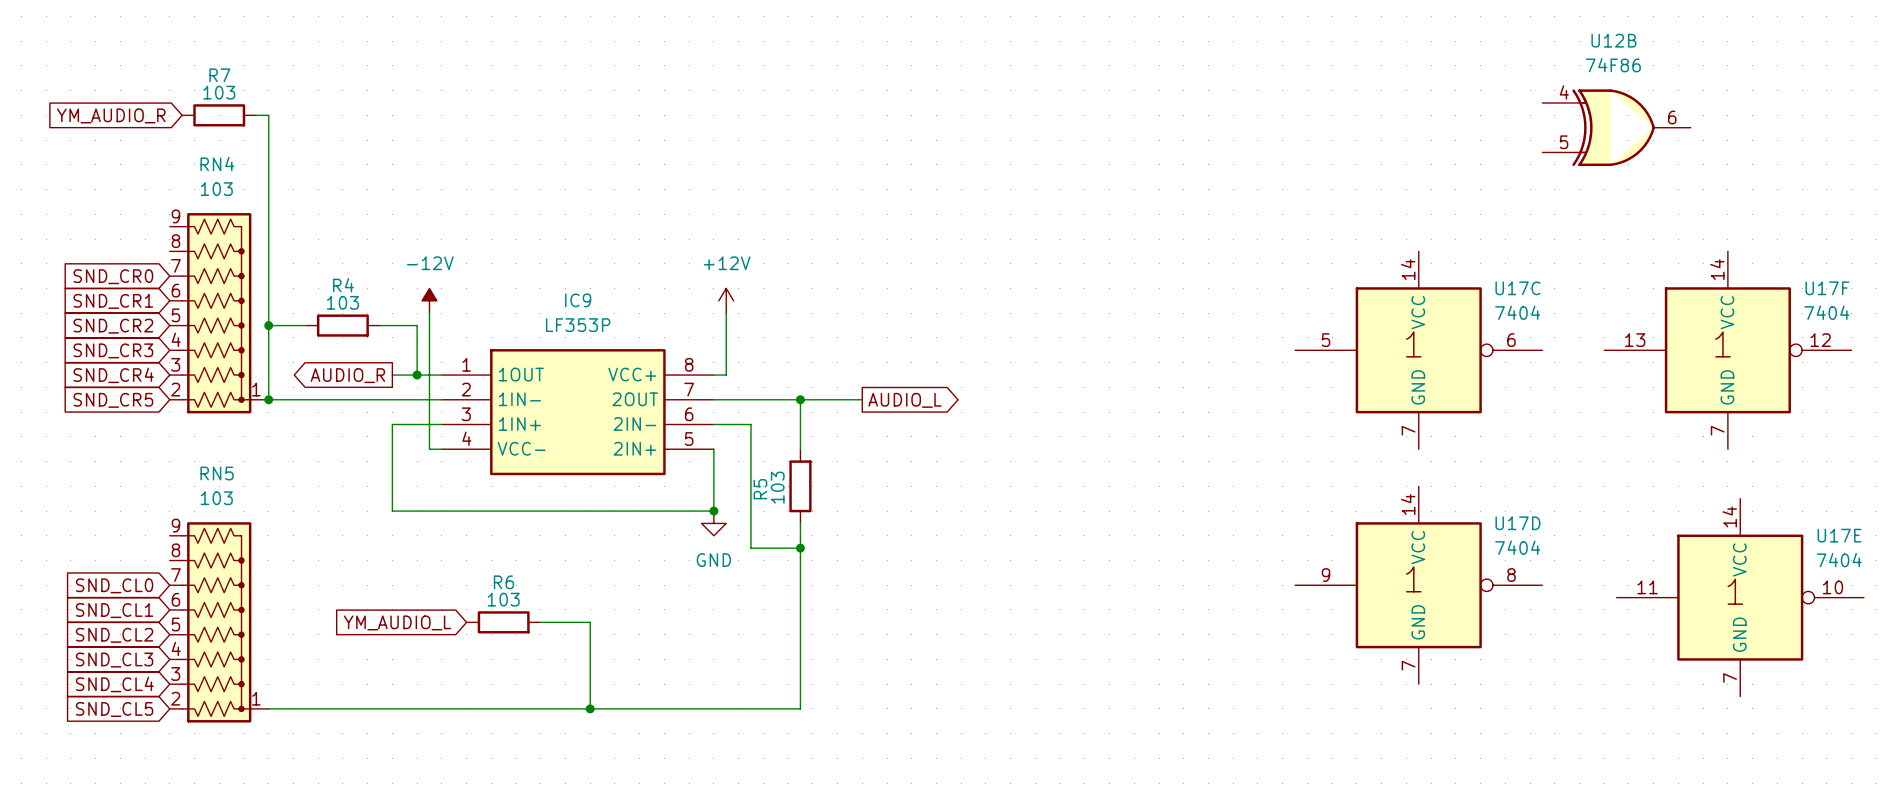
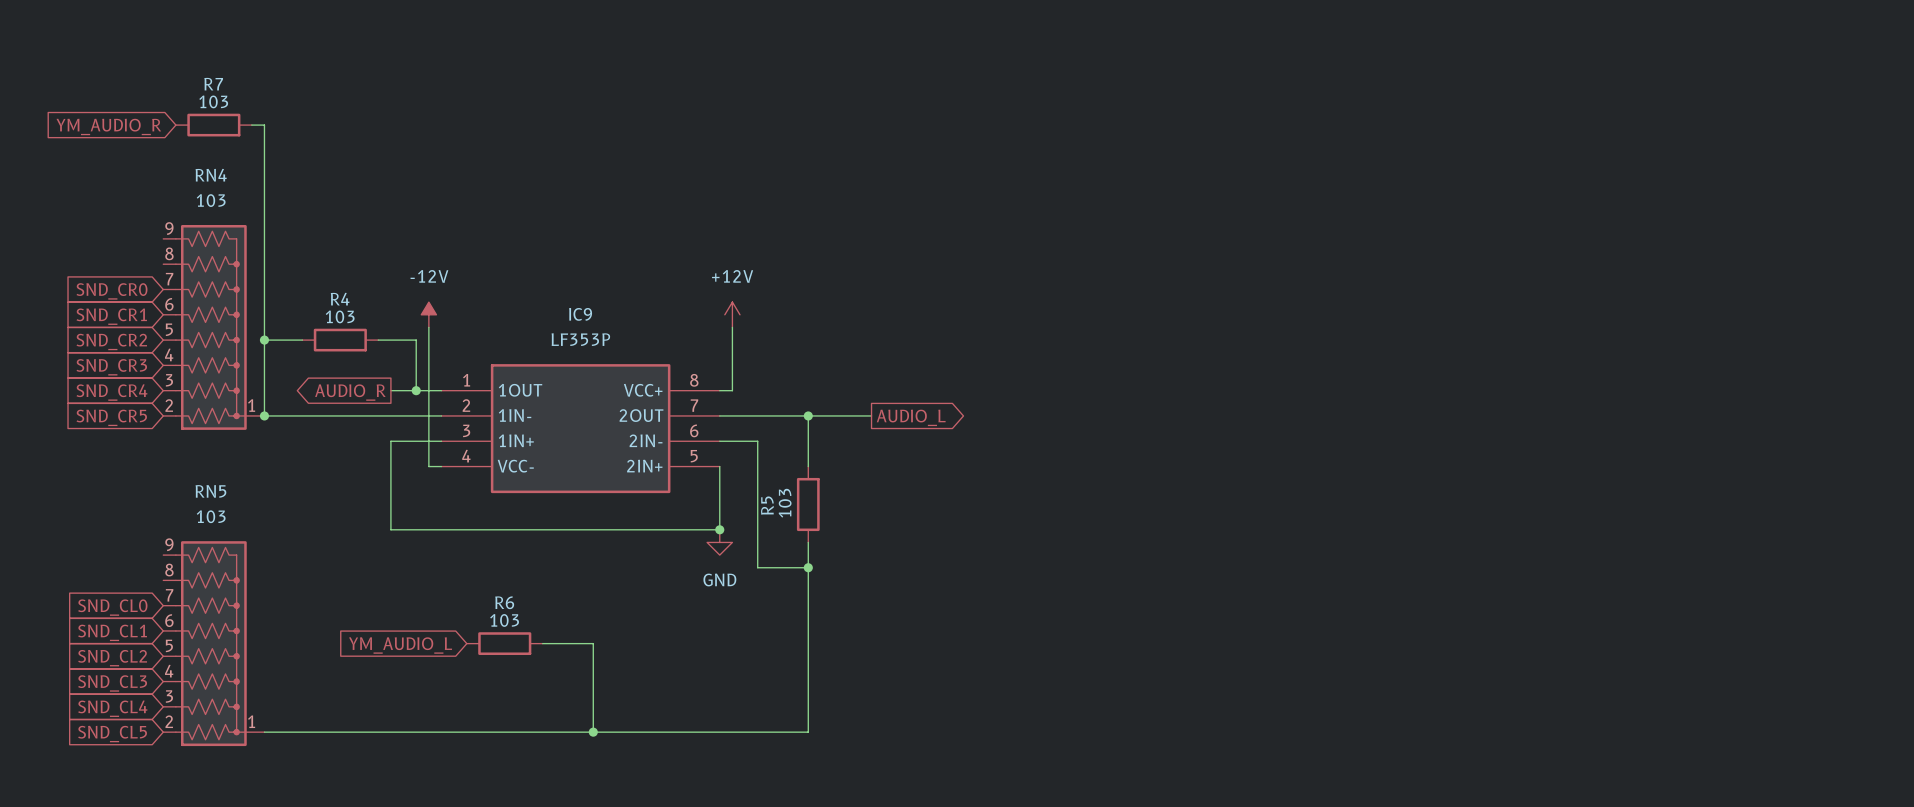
U12B: 74F86 (1616, 127) -> none
U17C: 7404 (1418, 350) -> none
U17F: 7404 (1727, 350) -> none
U17D: 7404 (1418, 585) -> none
U17E: 7404 (1740, 597) -> none

